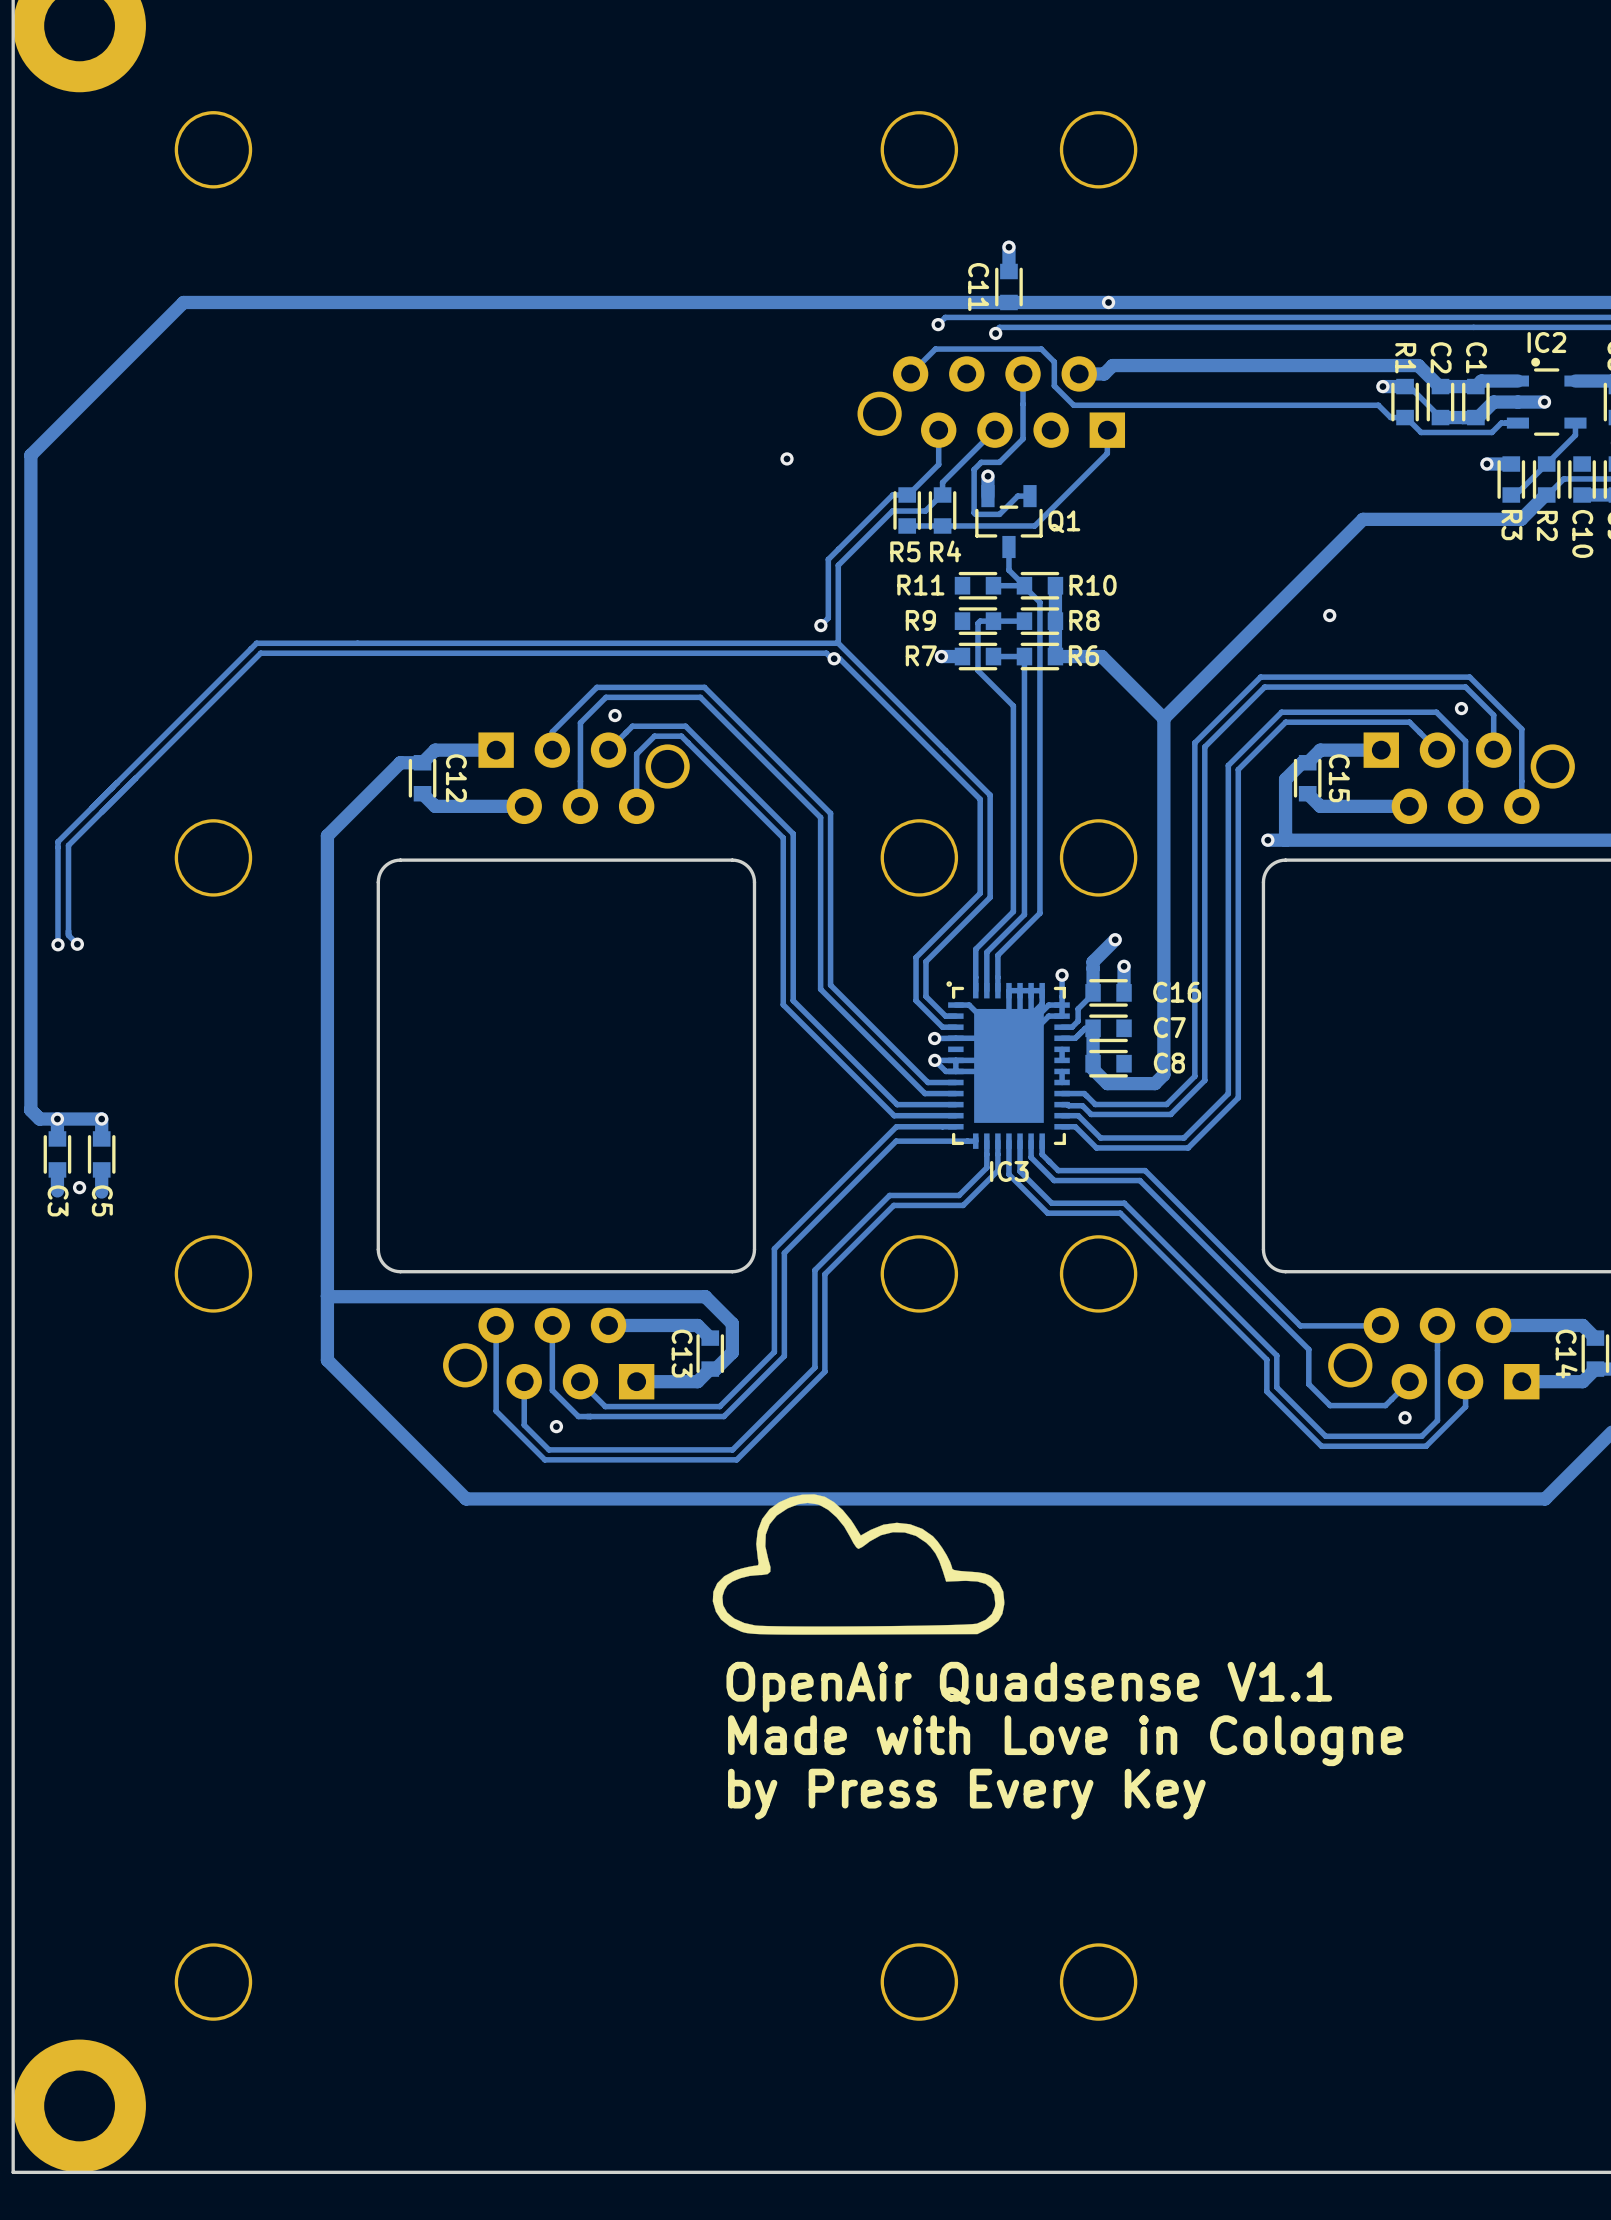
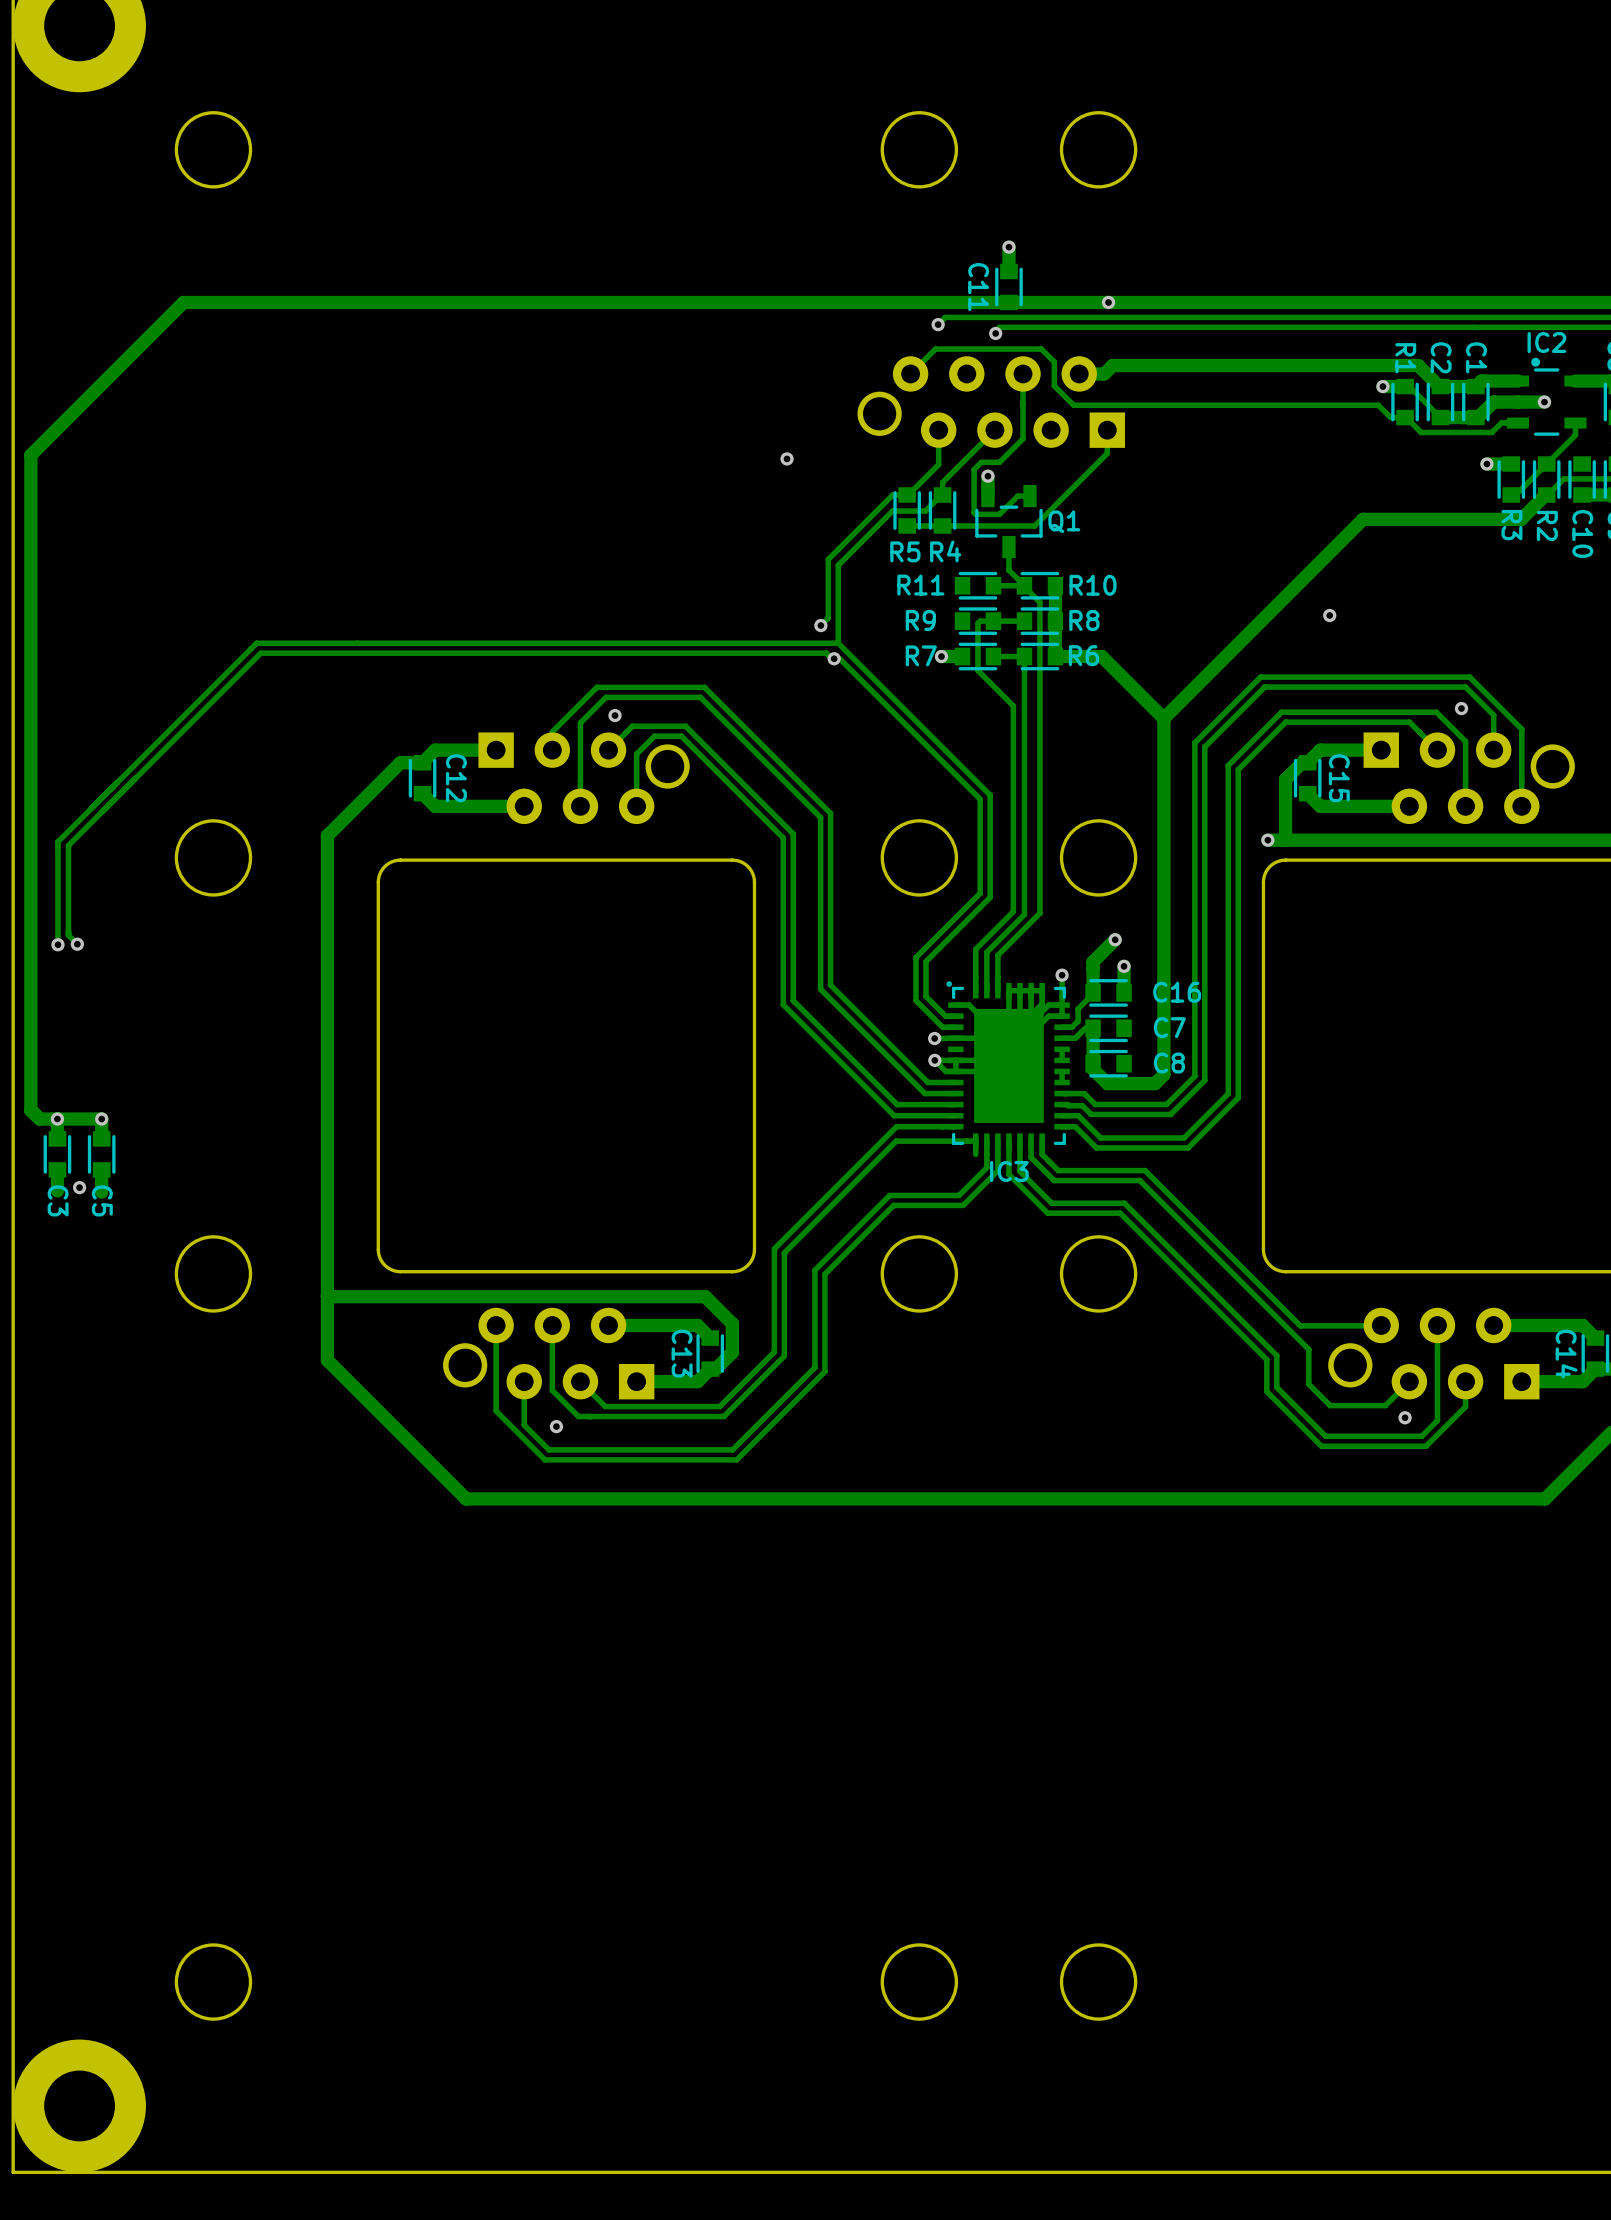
track: none -> (975, 1141) (975, 1154)
drawing: [712, 1494, 1005, 1635] -> none
text: OpenAir Quadsense V1.1 (1029, 1687) -> none
text: Made with Love in Cologne (1065, 1740) -> none
text: by Press Every Key (966, 1794) -> none

